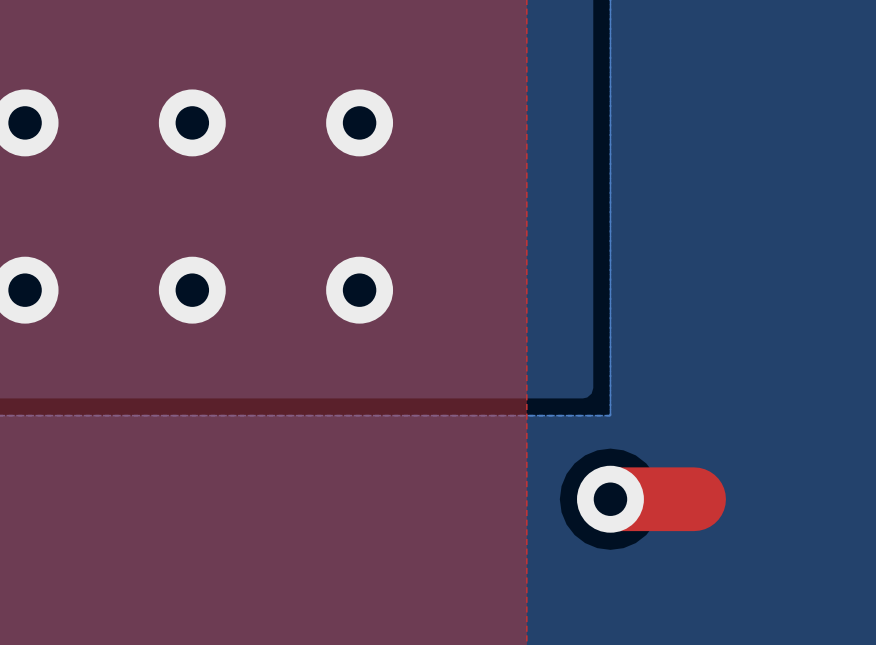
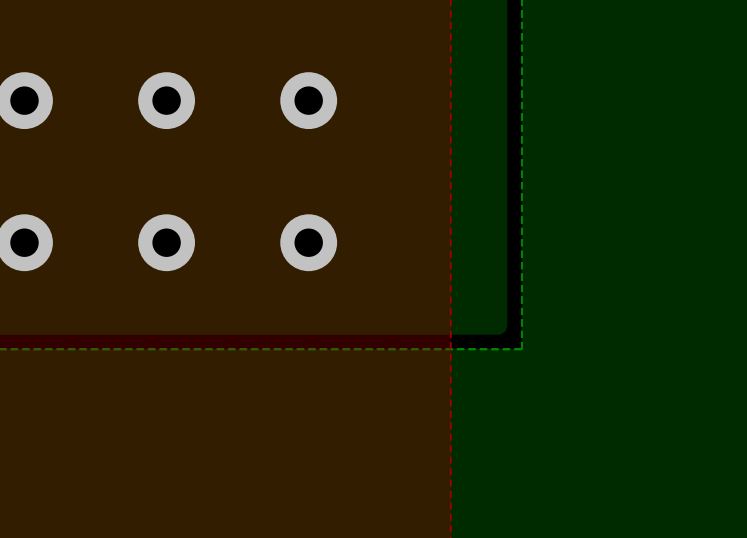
top track: (610, 499) (694, 499) -> none
via: (610, 499) -> none

